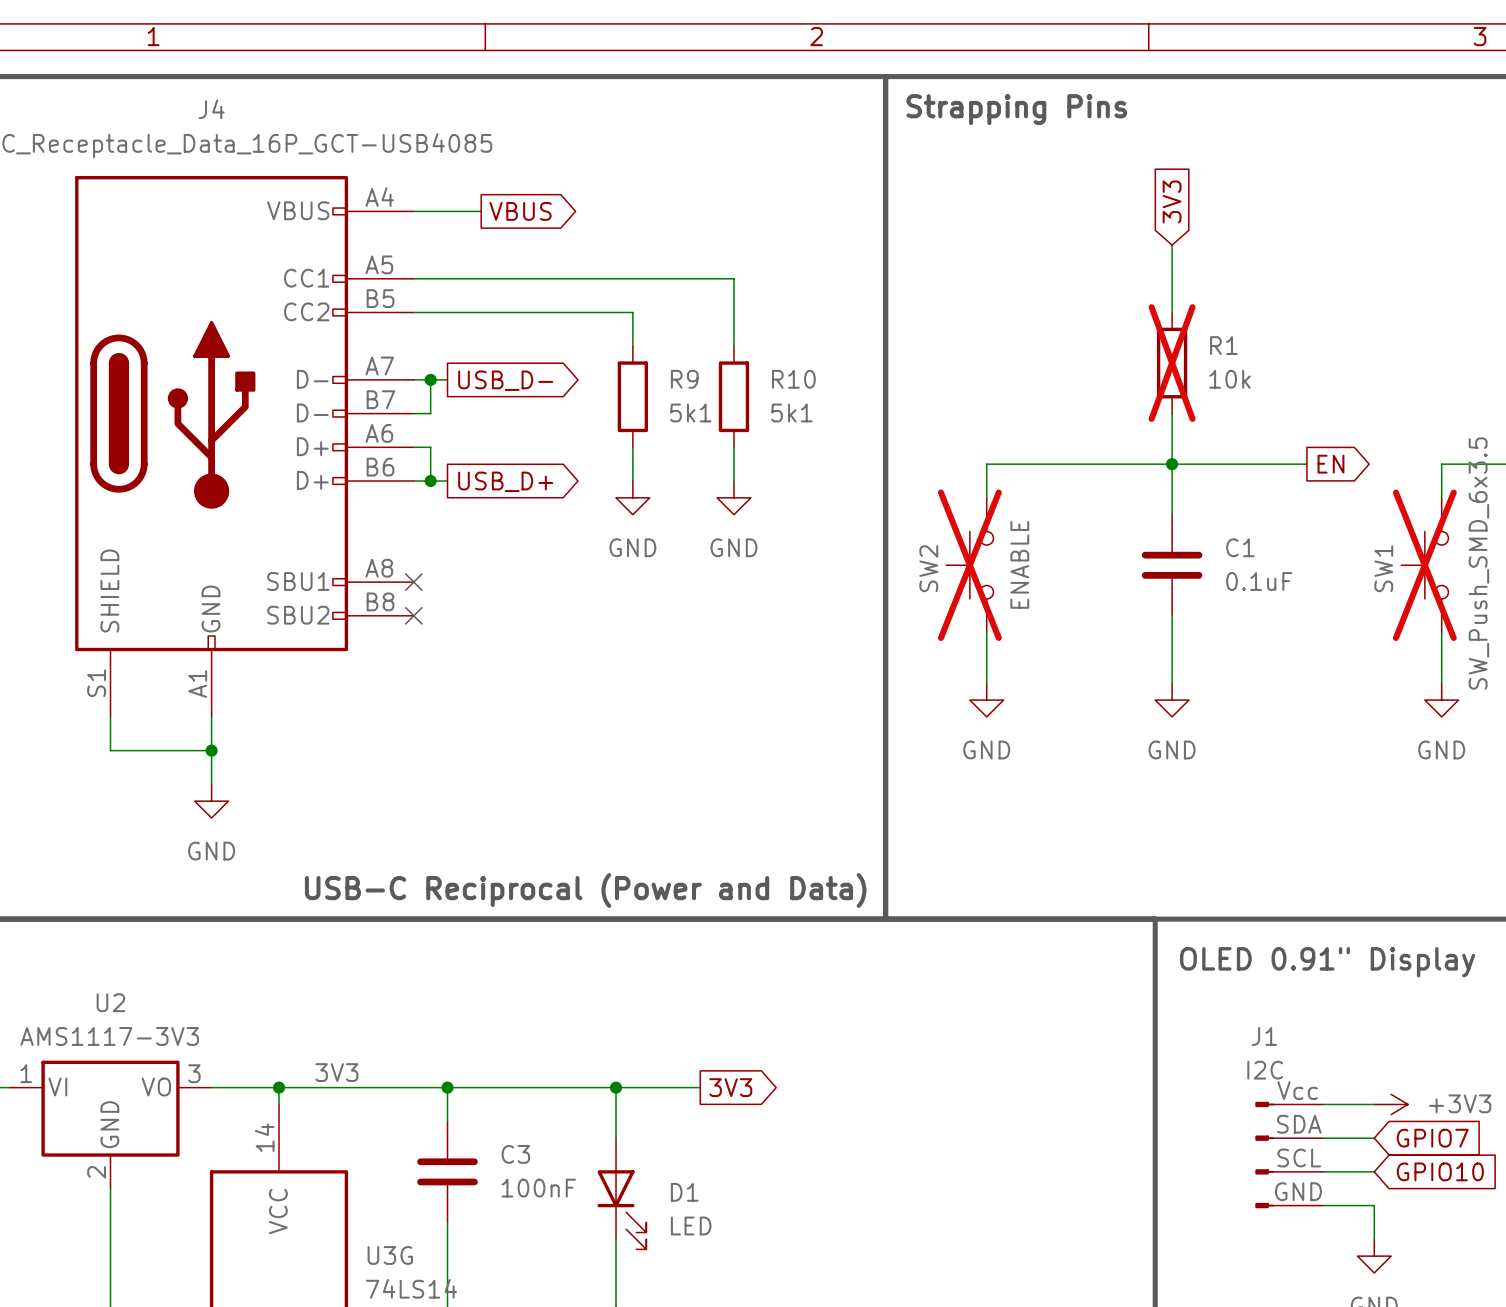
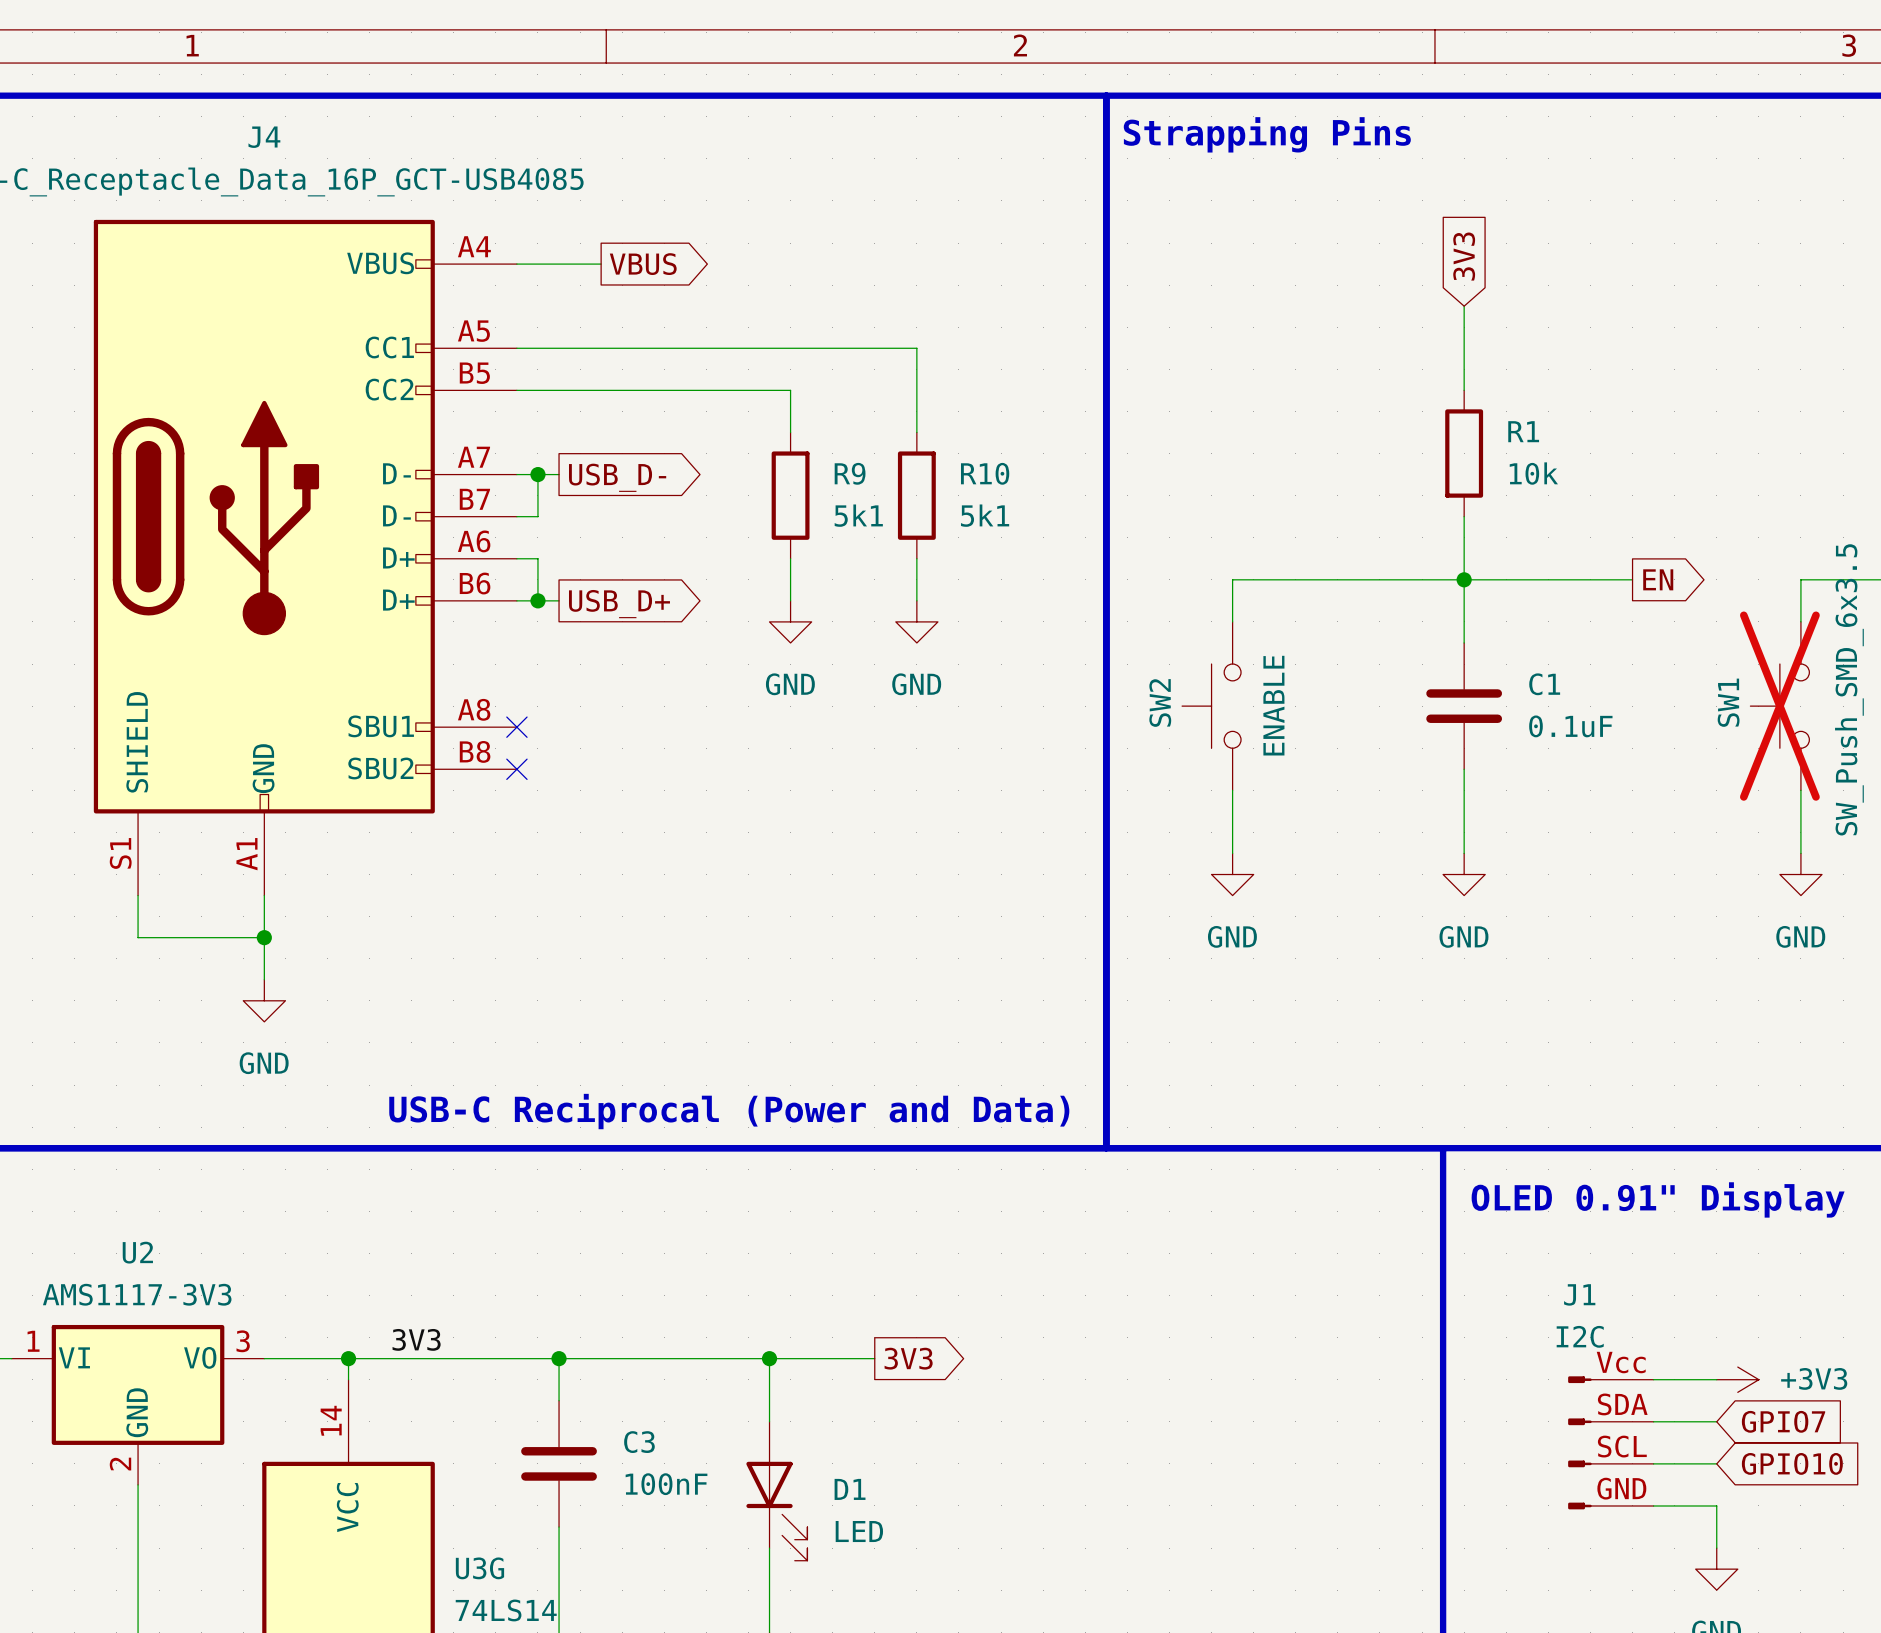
R1 do-not-place cross: (1172, 363) -> none
SW2 do-not-place cross: (969, 565) -> none

